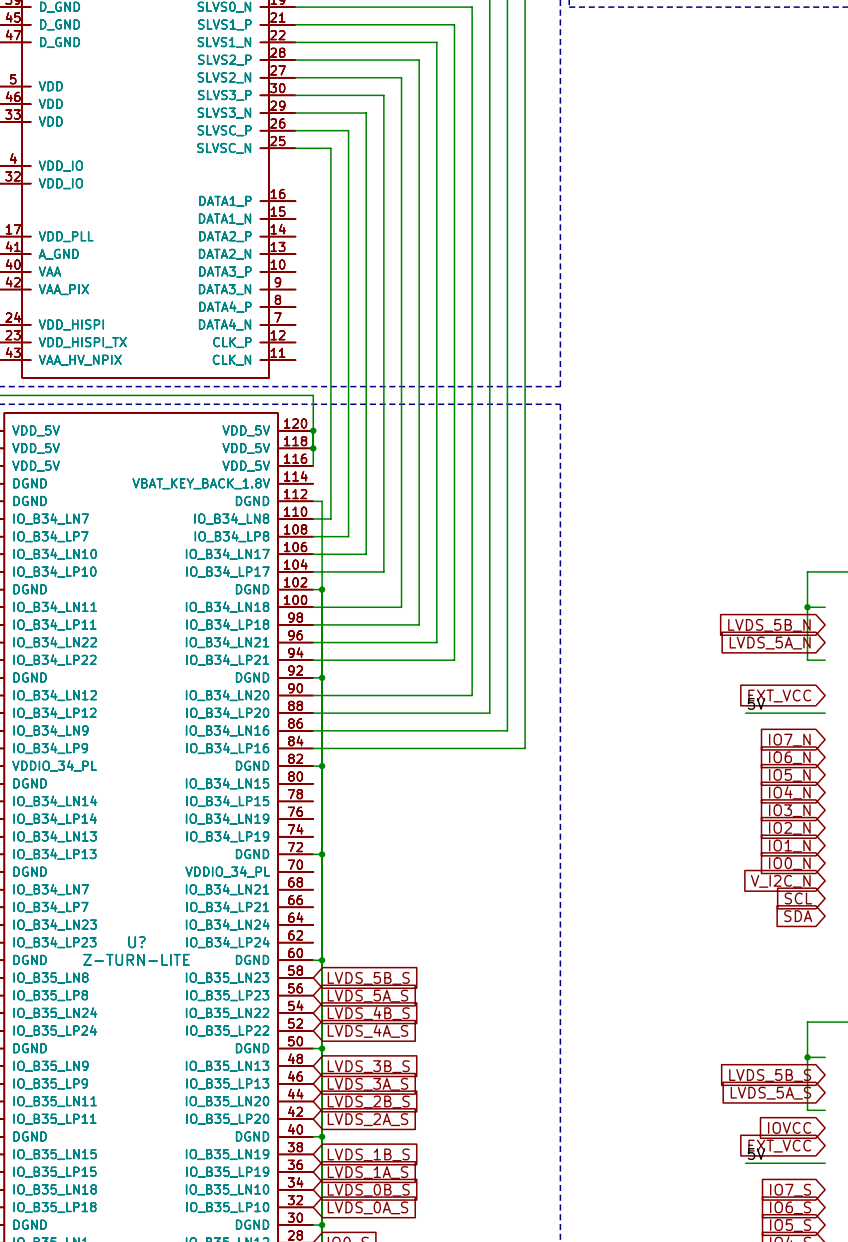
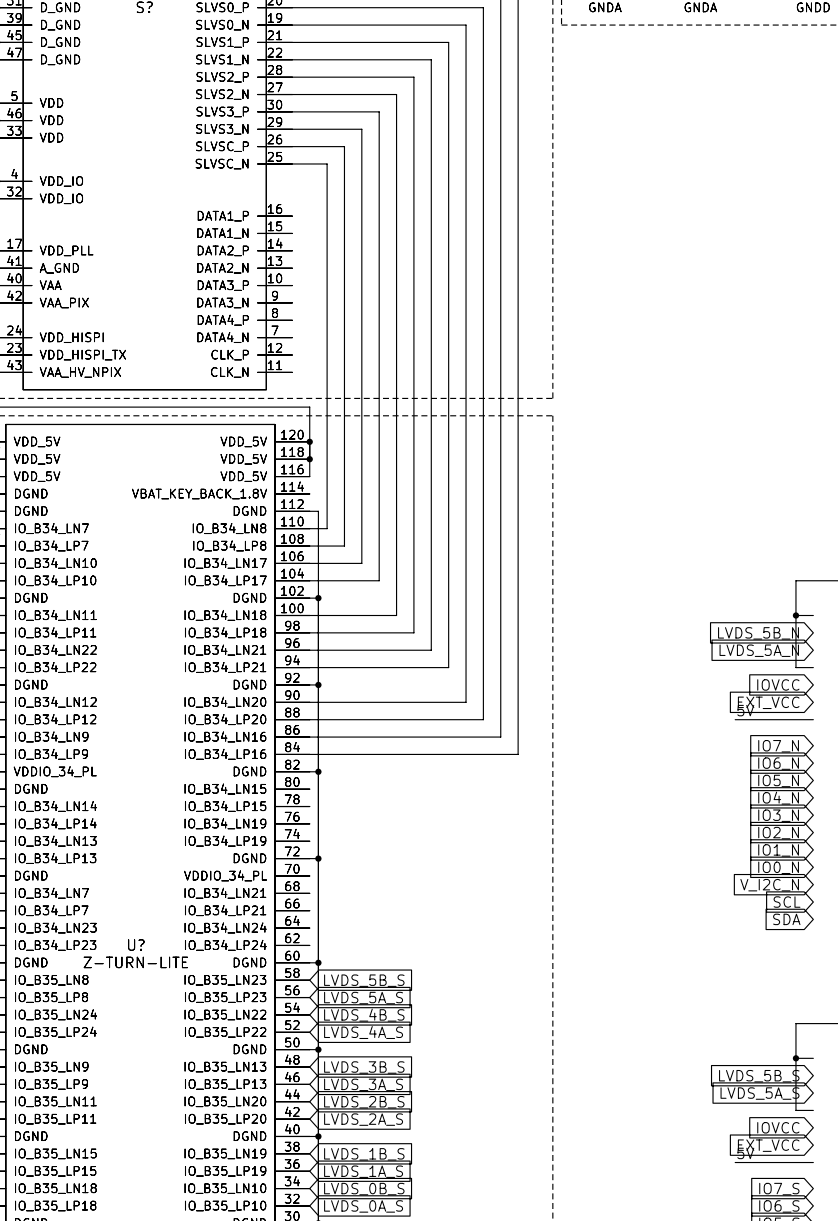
global label: none -> IOVCC (778, 684)

